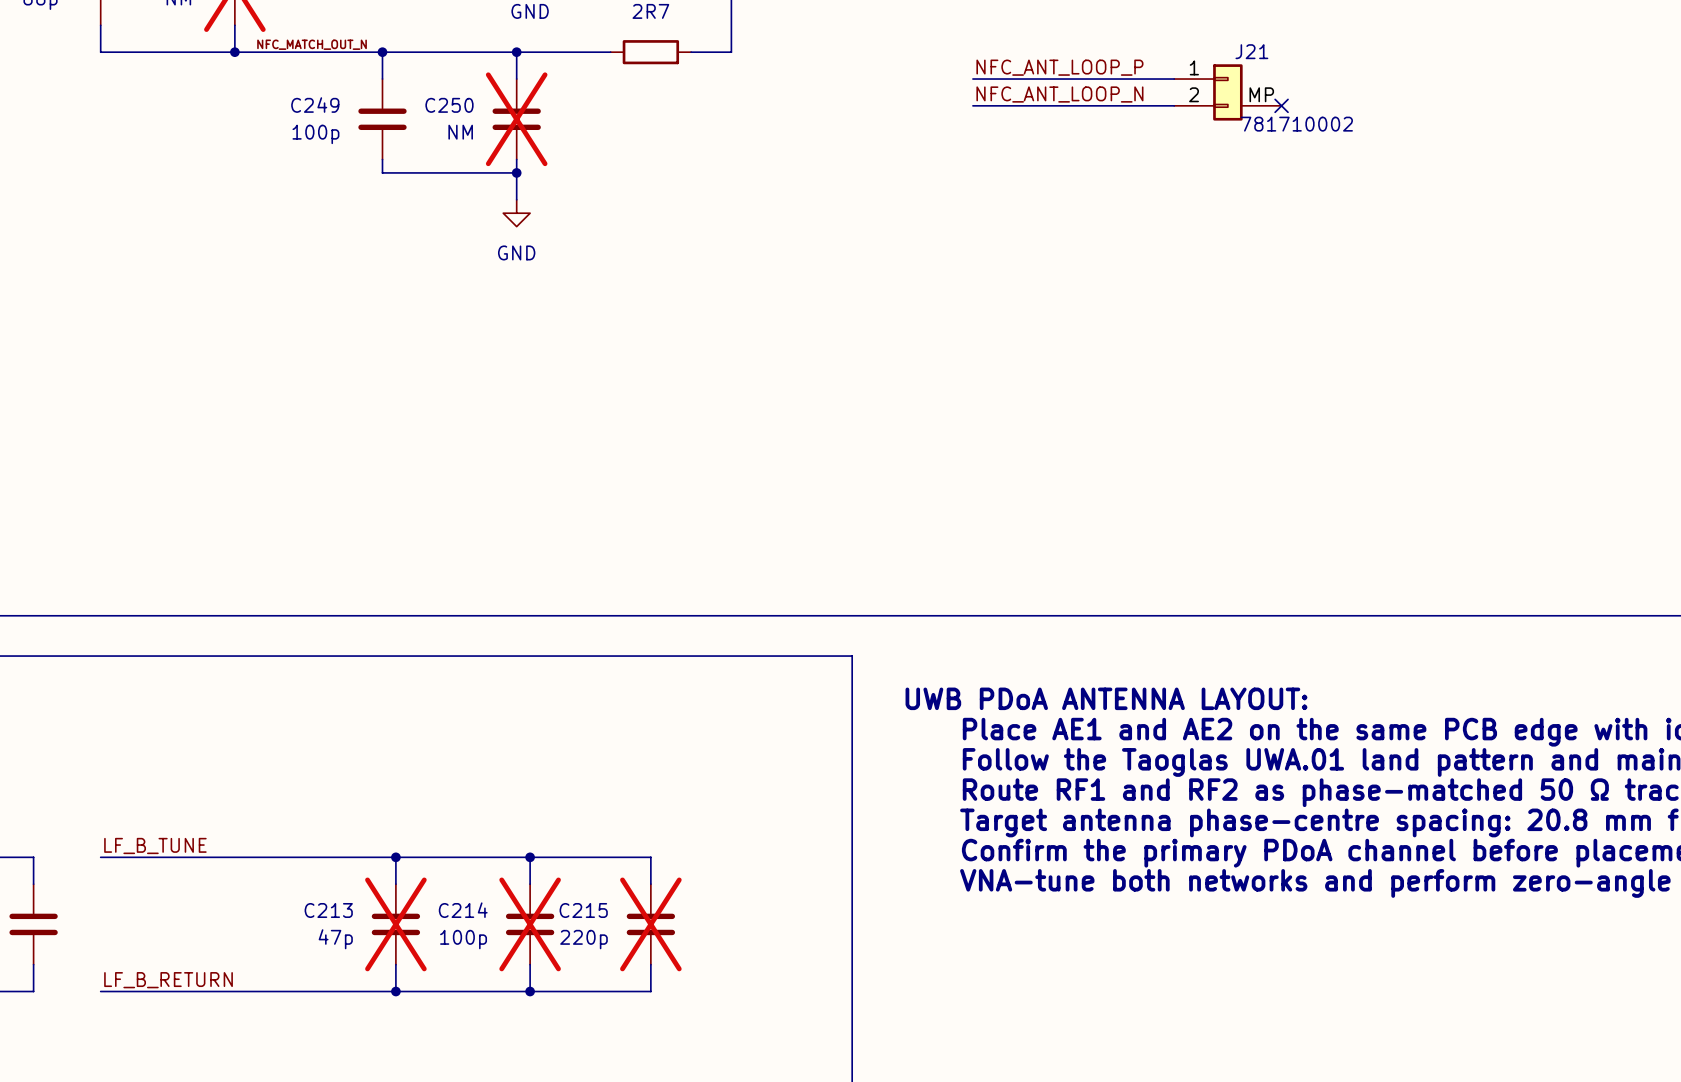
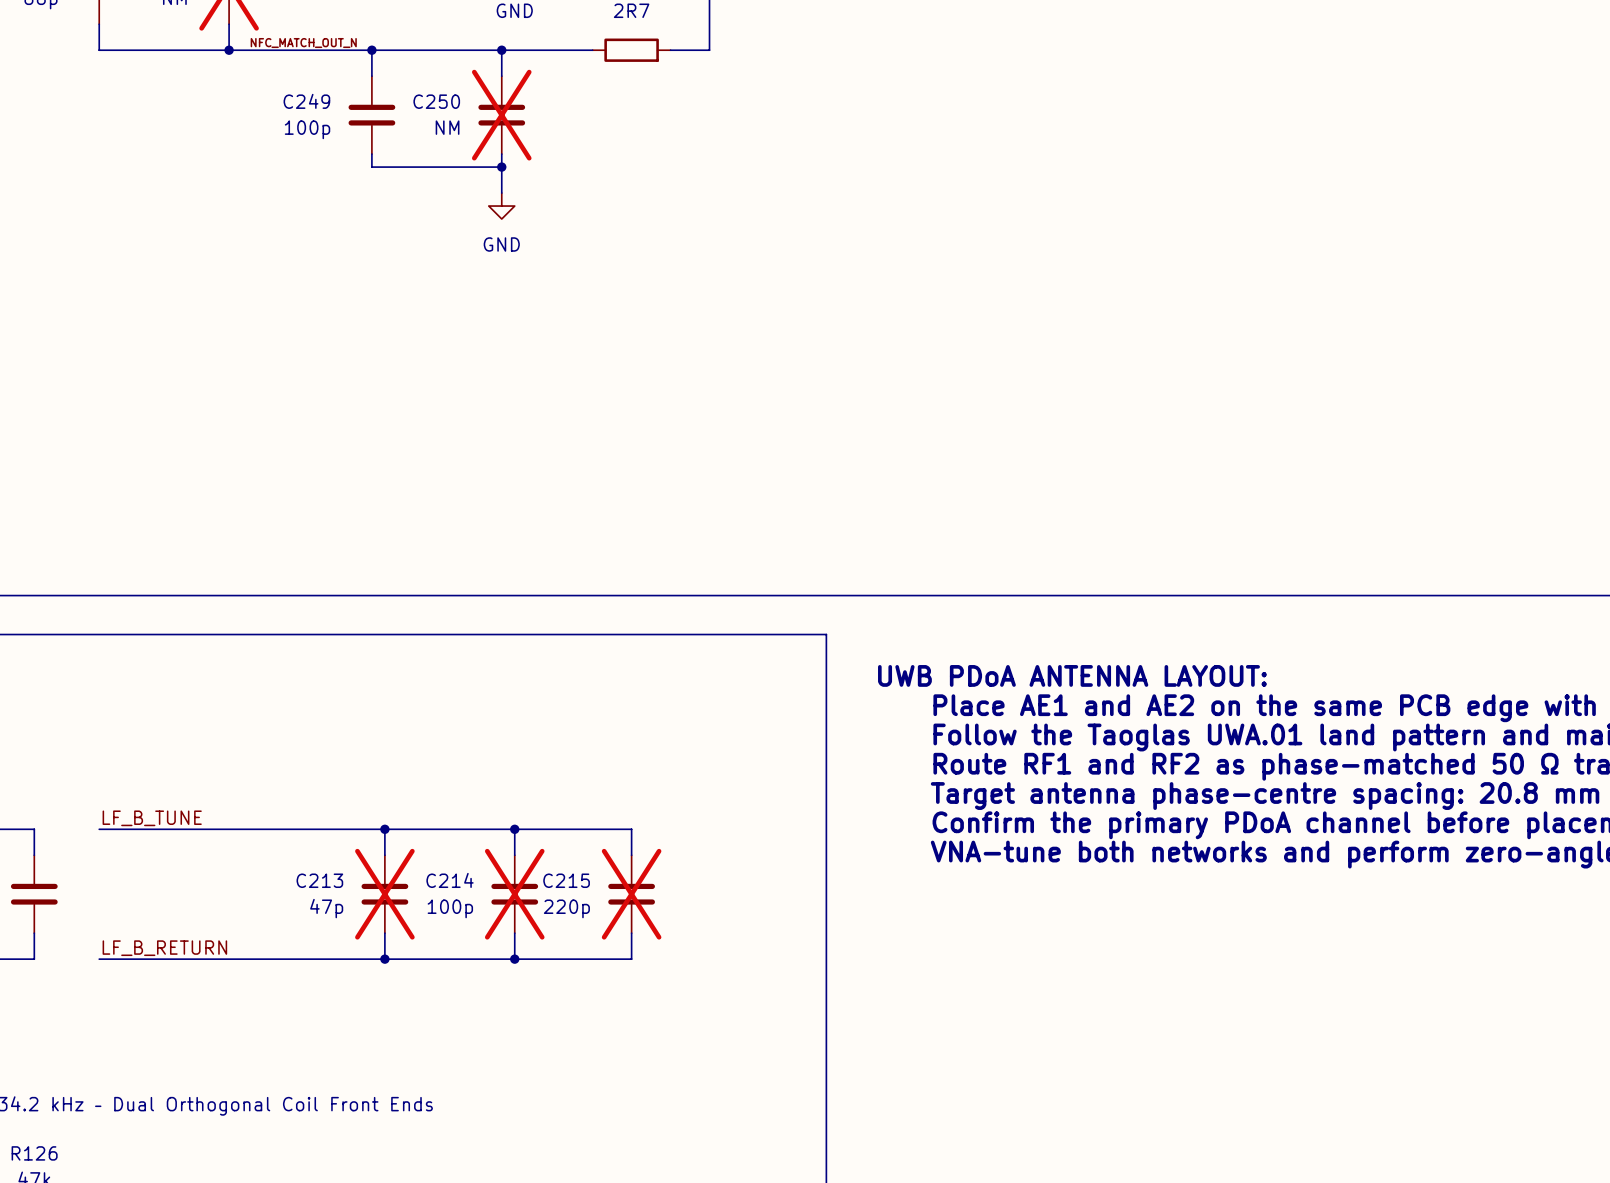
label: NFC_ANT_LOOP_P (1059, 67) -> none
wire: (972, 79) (1174, 79) -> none
J21: 781710002 (1227, 92) -> none
label: NFC_ANT_LOOP_N (1059, 94) -> none
wire: (972, 105) (1174, 105) -> none
no-connect mark: (1281, 105) -> none

